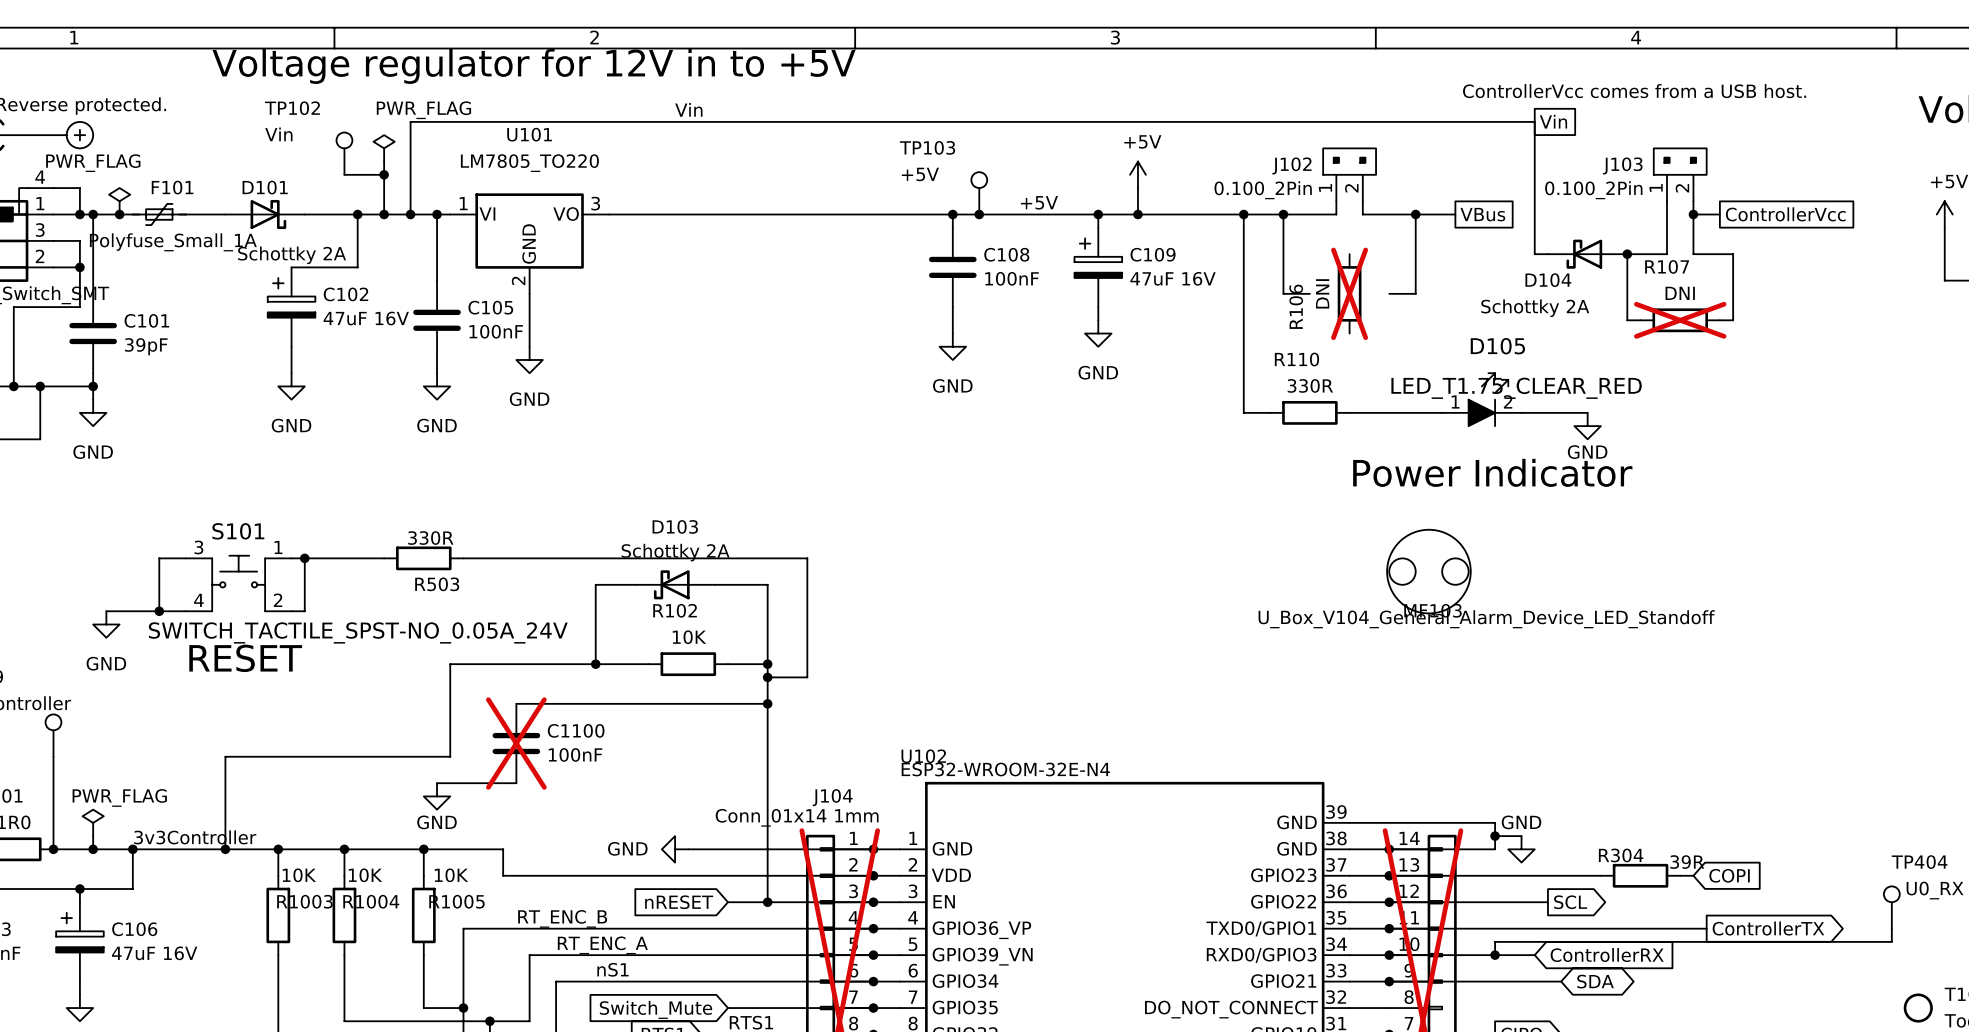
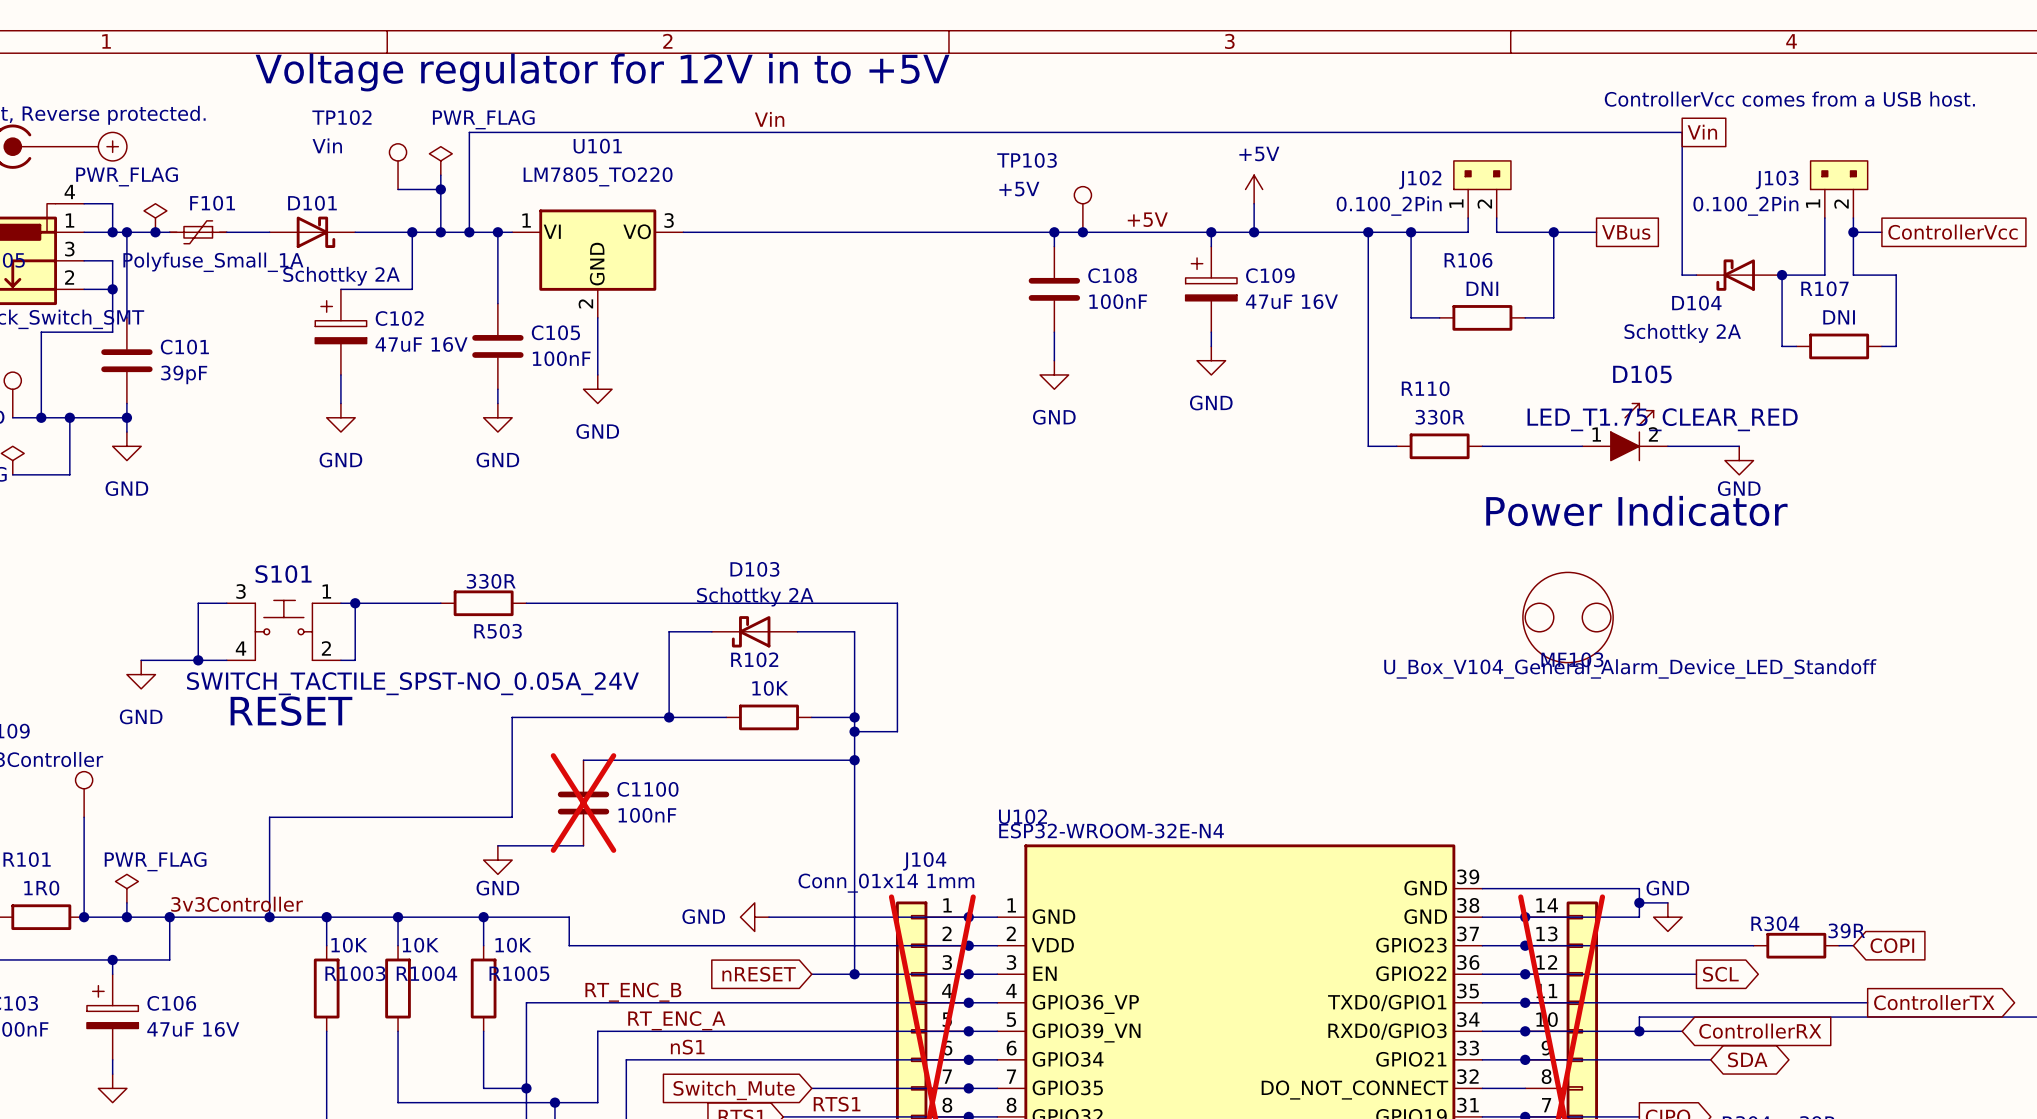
R106 rotation: 0° (1349, 293) -> 90° clockwise (1482, 317)
R106 do-not-place cross: (1349, 293) -> none
R107 do-not-place cross: (1680, 320) -> none

